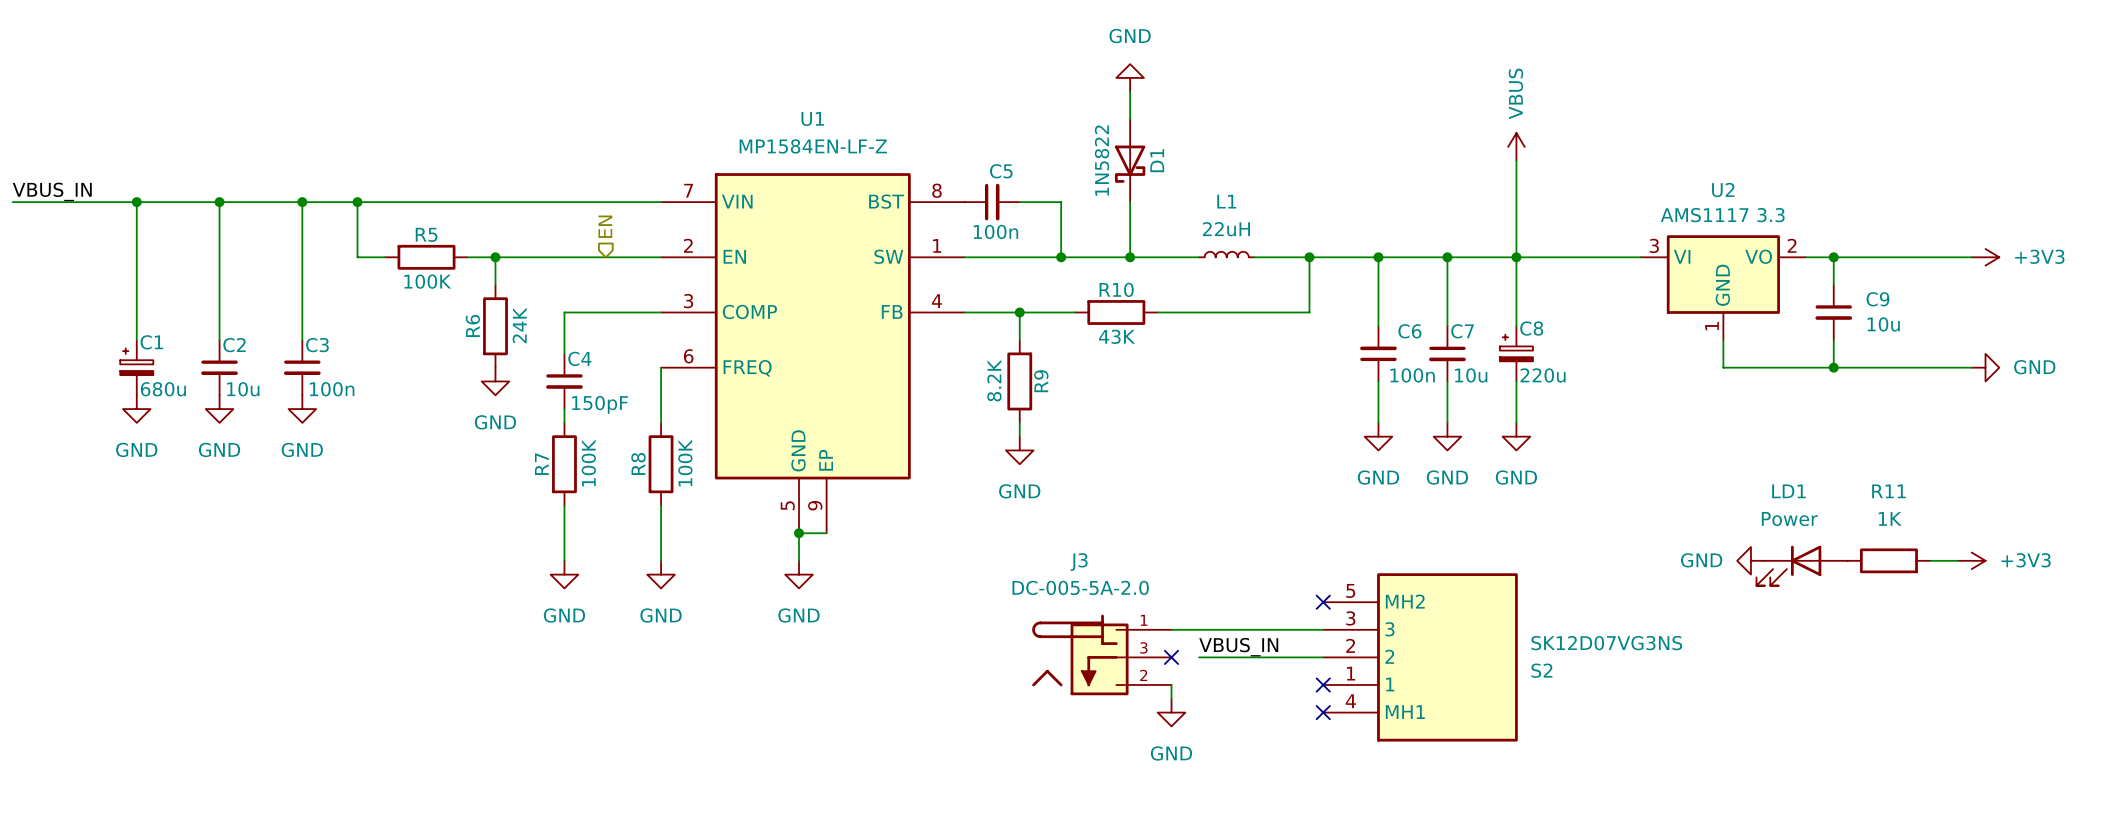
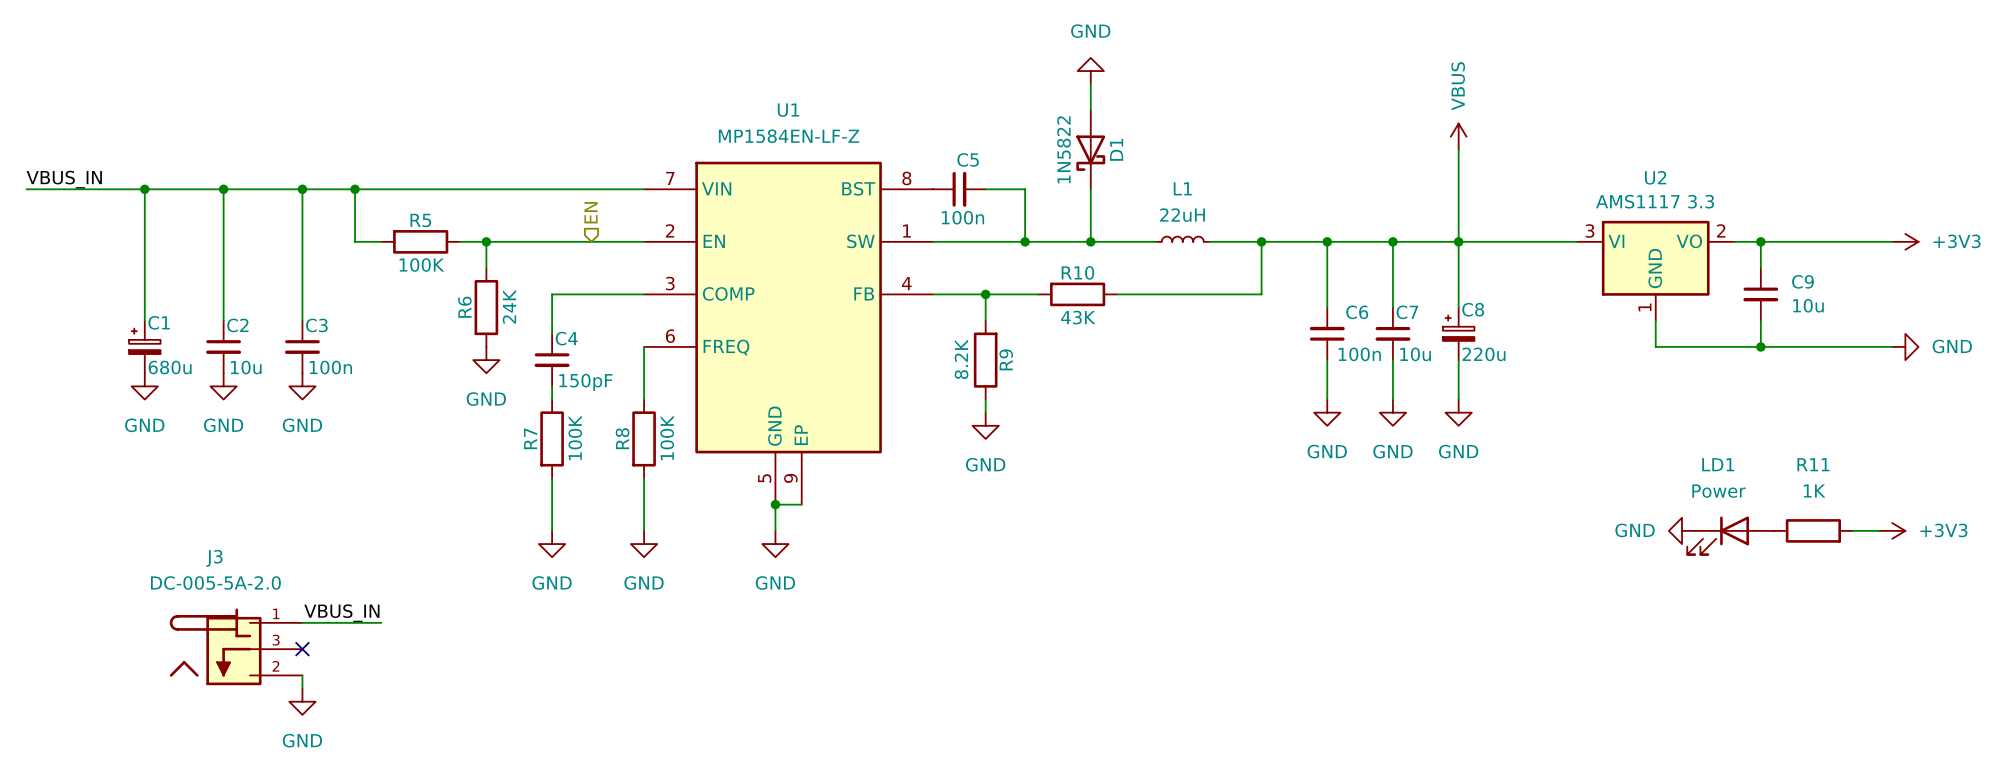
no-connect mark: (1323, 602) -> none
J3 symbol: [1032, 614, 1172, 696] -> [169, 608, 303, 686]
wire: (1171, 629) (1323, 629) -> none
label: none -> VBUS_IN (341, 613)
label: VBUS_IN (1238, 647) -> none
wire: none -> (302, 622) (381, 622)
no-connect mark: (1171, 657) -> none
wire: (1199, 657) (1323, 657) -> none
S2: SK12D07VG3NS (1420, 657) -> none
no-connect mark: none -> (302, 649)
wire: (1171, 684) (1171, 698) -> none
no-connect mark: (1323, 684) -> none
wire: none -> (302, 675) (302, 688)
power symbol: GND (1171, 712) -> none
no-connect mark: (1323, 712) -> none
power symbol: none -> GND (302, 701)

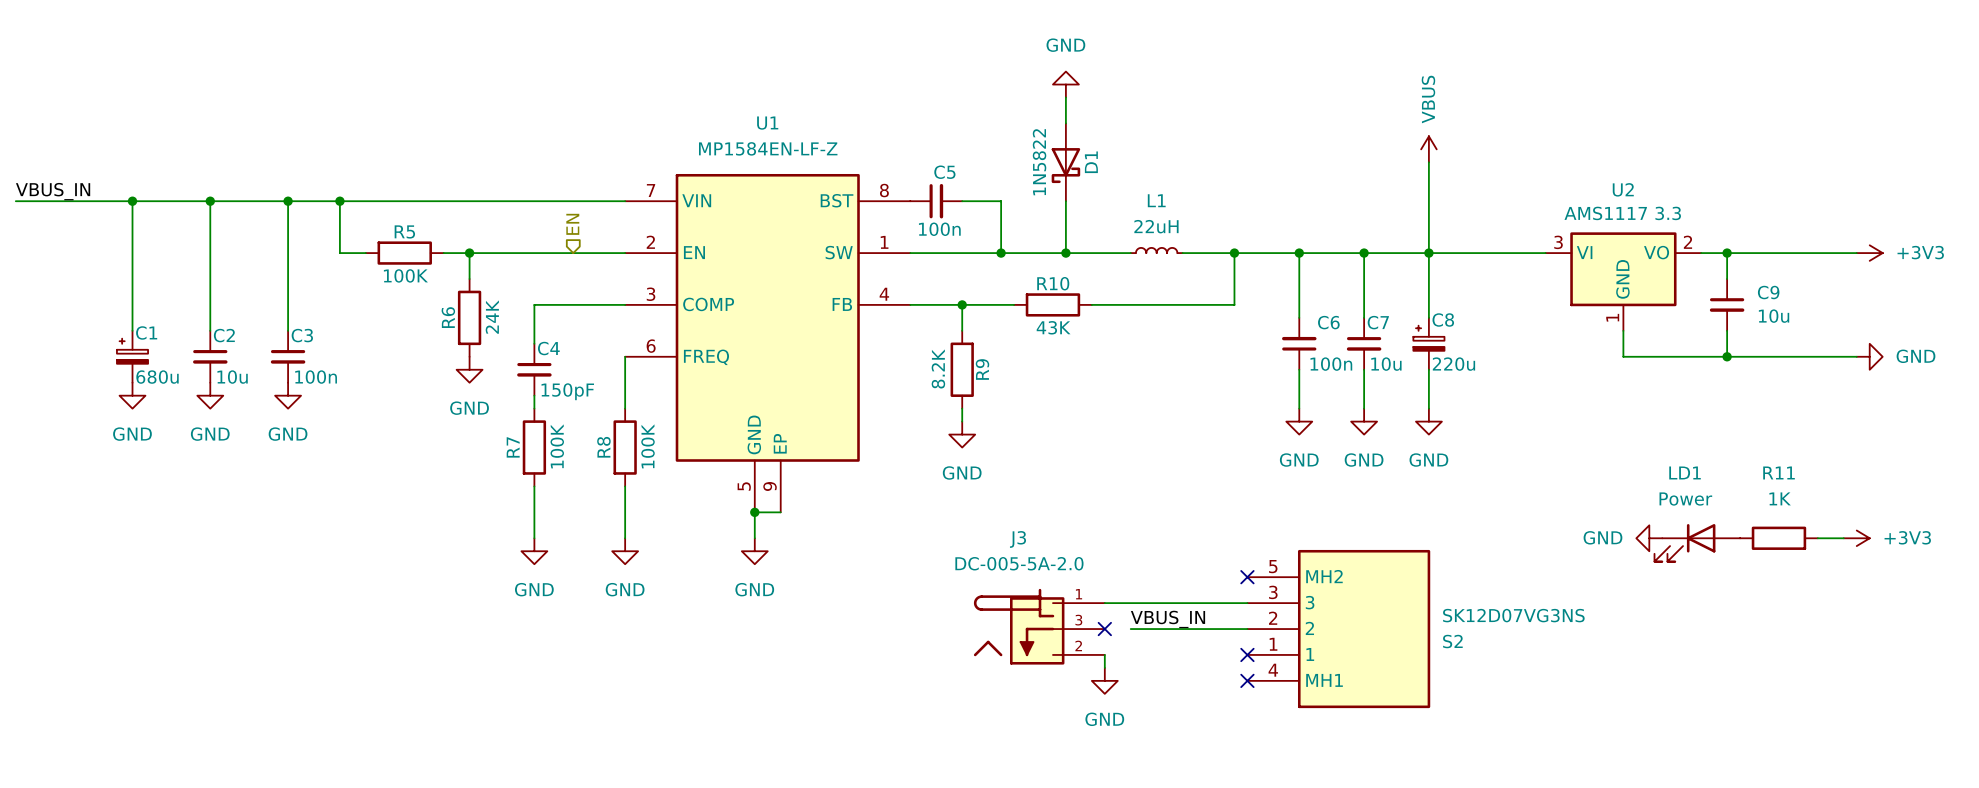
no-connect mark: none -> (1247, 577)
wire: none -> (1104, 603) (1247, 603)
label: VBUS_IN (341, 613) -> none
label: none -> VBUS_IN (1168, 619)
wire: (302, 622) (381, 622) -> none
no-connect mark: none -> (1104, 629)
wire: none -> (1130, 629) (1247, 629)
S2: none -> SK12D07VG3NS (1338, 629)
J3 position: (236, 646) -> (1039, 626)
no-connect mark: (302, 649) -> none
wire: none -> (1104, 654) (1104, 667)
no-connect mark: none -> (1247, 654)
wire: (302, 675) (302, 688) -> none
power symbol: none -> GND (1104, 680)
no-connect mark: none -> (1247, 680)
power symbol: GND (302, 701) -> none

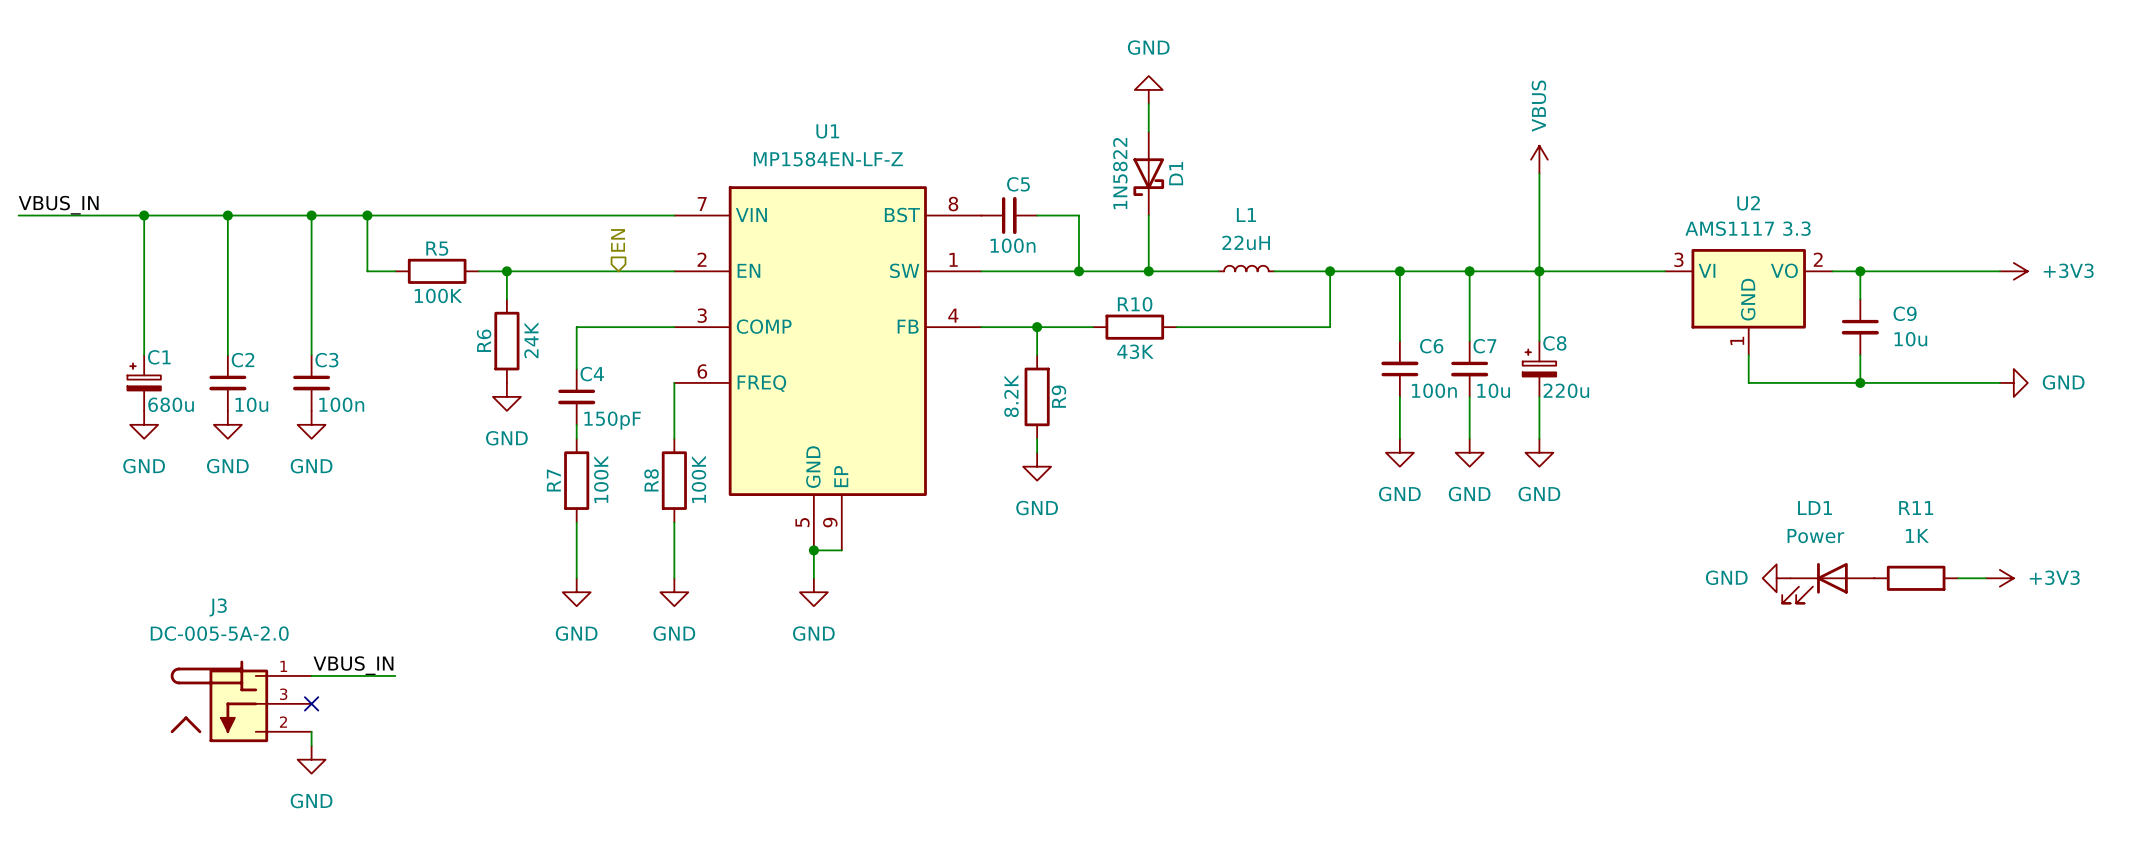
no-connect mark: (1247, 577) -> none
wire: (1104, 603) (1247, 603) -> none
label: none -> VBUS_IN (353, 665)
label: VBUS_IN (1168, 619) -> none
J3 position: (1039, 626) -> (241, 701)
wire: none -> (311, 675) (395, 675)
no-connect mark: (1104, 629) -> none
wire: (1130, 629) (1247, 629) -> none
S2: SK12D07VG3NS (1338, 629) -> none
no-connect mark: none -> (311, 703)
wire: (1104, 654) (1104, 667) -> none
no-connect mark: (1247, 654) -> none
wire: none -> (311, 731) (311, 745)
power symbol: GND (1104, 680) -> none
no-connect mark: (1247, 680) -> none
power symbol: none -> GND (311, 759)

